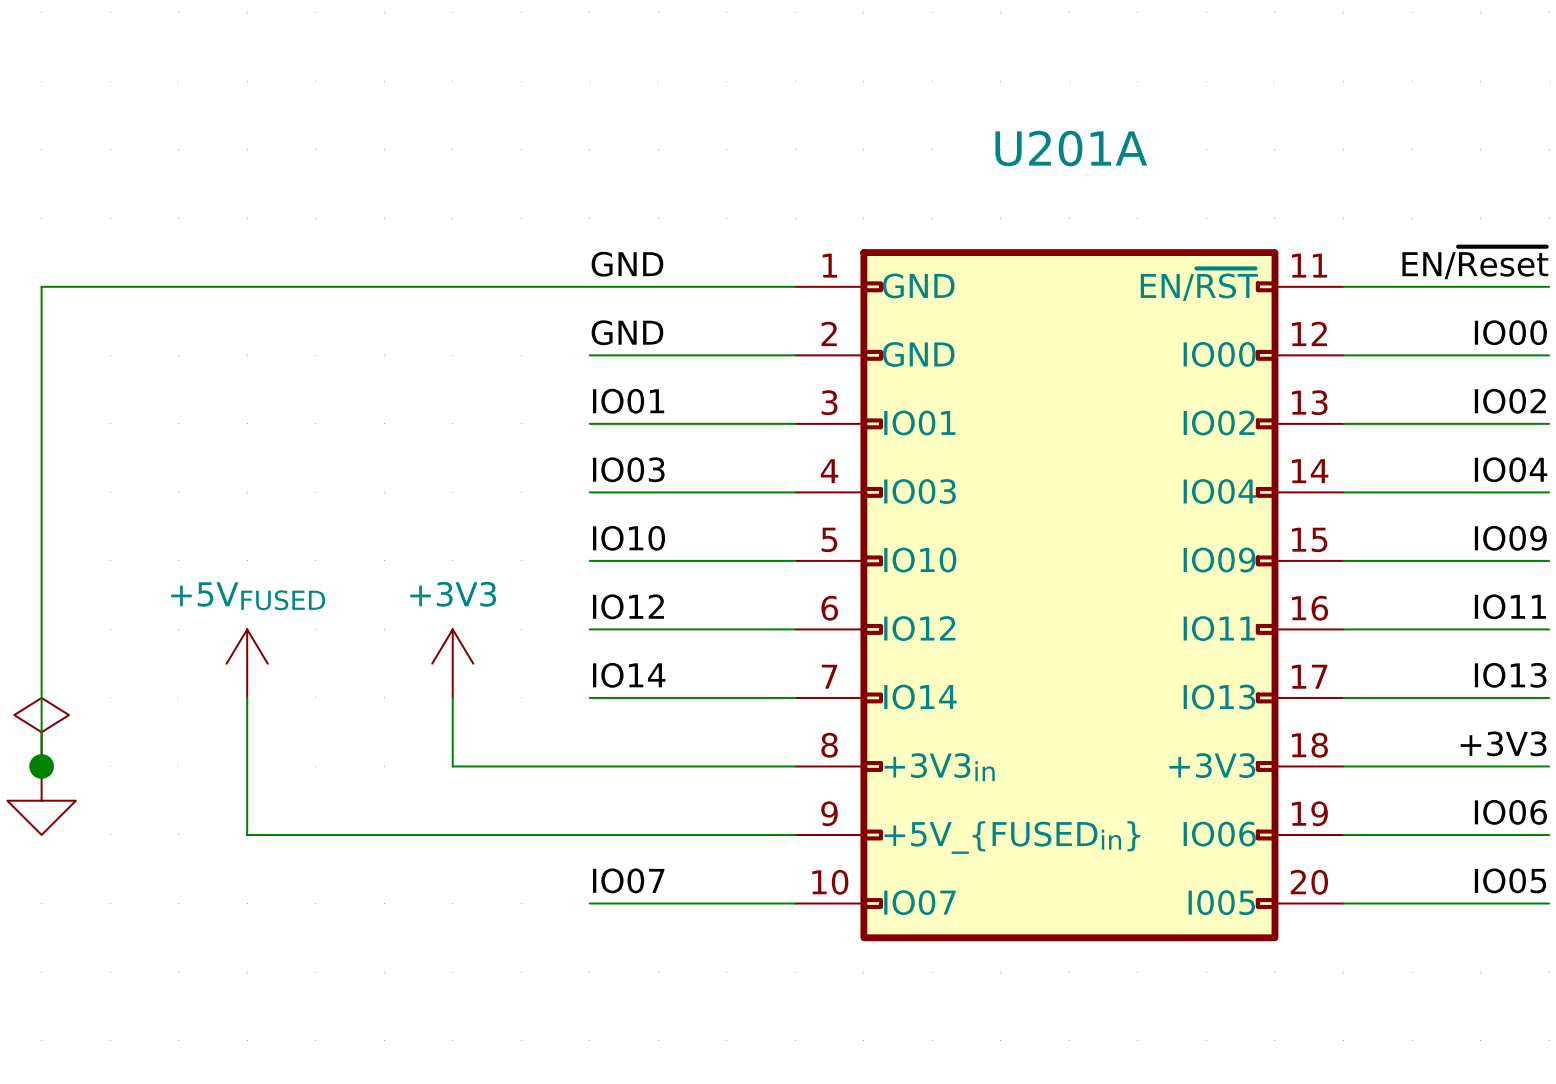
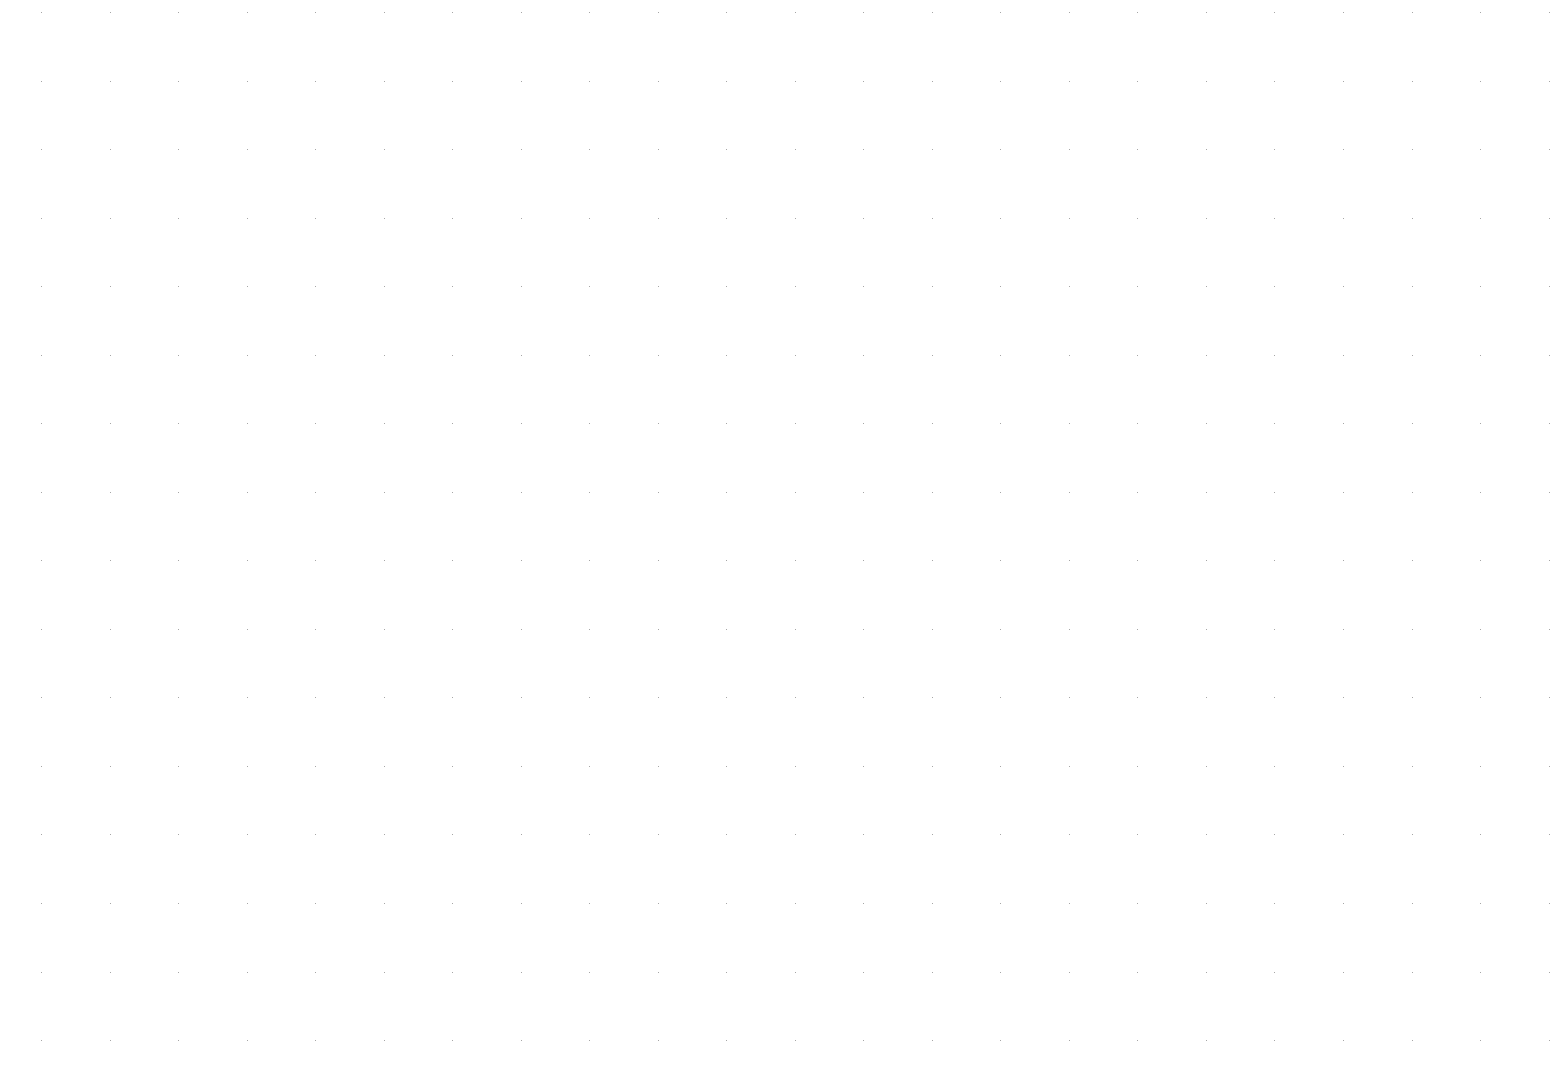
label: EN/~{Reset} (1475, 262) -> none
label: GND (627, 264) -> none
wire: (795, 286) (41, 286) (41, 766) -> none
wire: (1343, 286) (1549, 286) -> none
label: GND (627, 332) -> none
label: IO00 (1510, 332) -> none
wire: (589, 355) (795, 355) -> none
wire: (1343, 355) (1549, 355) -> none
label: IO01 (628, 401) -> none
label: IO02 (1510, 401) -> none
wire: (589, 423) (795, 423) -> none
wire: (1343, 423) (1549, 423) -> none
label: IO03 (628, 469) -> none
label: IO04 (1511, 469) -> none
wire: (589, 492) (795, 492) -> none
wire: (1343, 492) (1549, 492) -> none
label: IO10 (629, 538) -> none
label: IO09 (1510, 538) -> none
wire: (589, 560) (795, 560) -> none
wire: (1343, 560) (1549, 560) -> none
U201A: (1069, 595) -> none
label: IO12 (628, 606) -> none
label: IO11 (1510, 606) -> none
wire: (589, 629) (795, 629) -> none
wire: (1343, 629) (1549, 629) -> none
power symbol: +5VFUSED (247, 663) -> none
power symbol: +3V3 (452, 663) -> none
label: IO14 (629, 675) -> none
label: IO13 (1510, 675) -> none
wire: (247, 697) (247, 834) (795, 834) -> none
wire: (452, 697) (452, 766) (795, 766) -> none
wire: (589, 697) (795, 697) -> none
wire: (1343, 697) (1549, 697) -> none
power symbol: (41, 732) -> none
label: +3V3 (1503, 743) -> none
junction: (41, 766) -> none
wire: (1343, 766) (1549, 766) -> none
power symbol: (41, 800) -> none
label: IO06 (1510, 812) -> none
wire: (1343, 834) (1549, 834) -> none
label: IO07 (628, 880) -> none
label: IO05 (1510, 880) -> none
wire: (589, 903) (795, 903) -> none
wire: (1343, 903) (1549, 903) -> none

